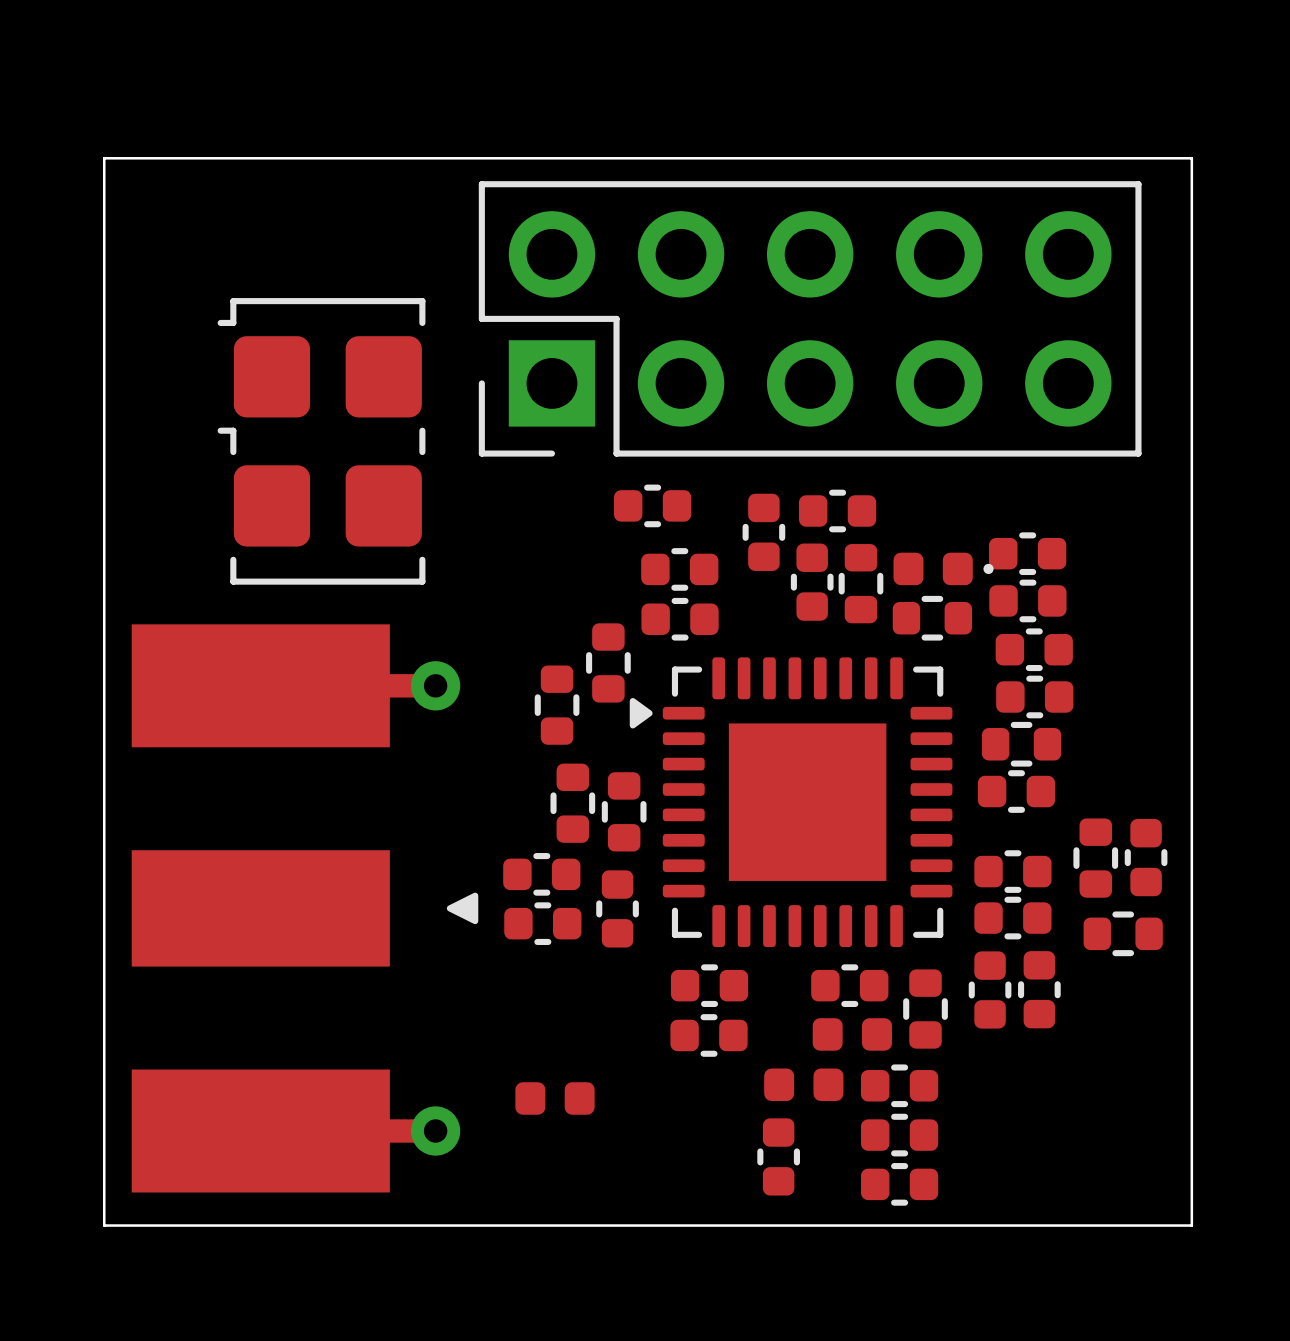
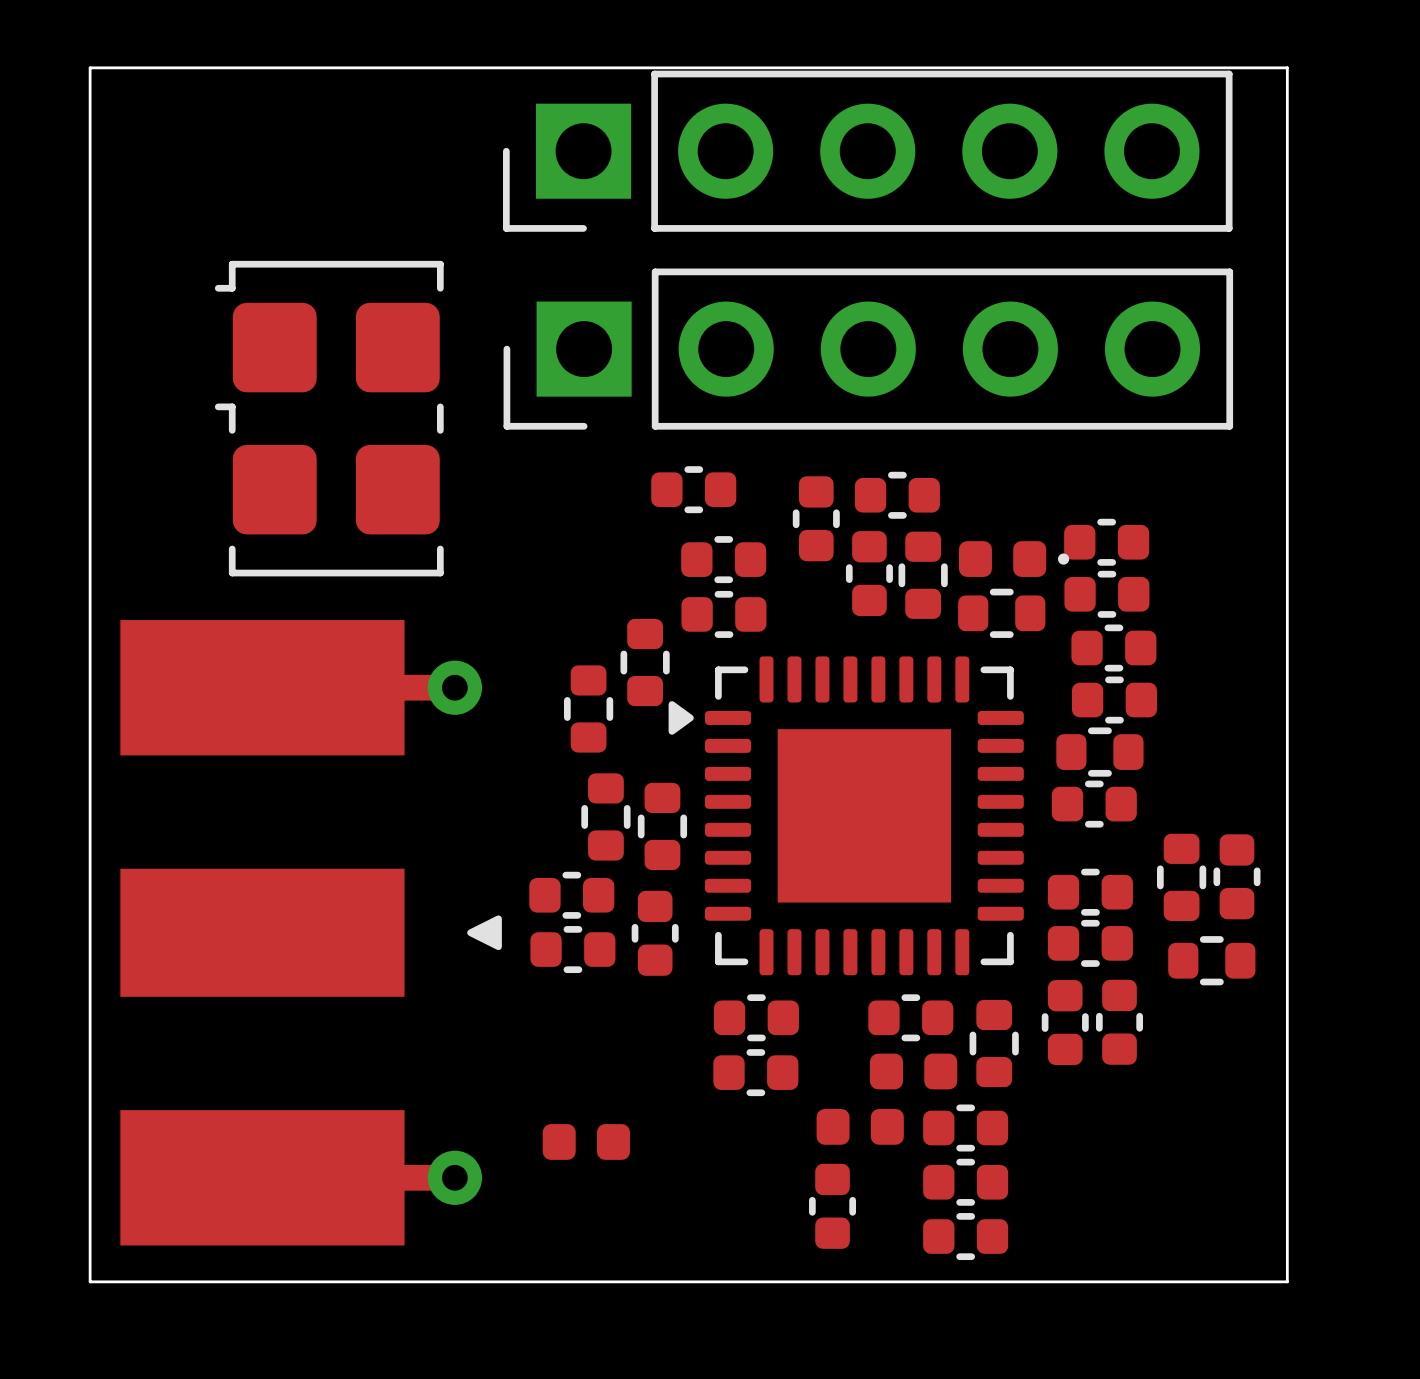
board edge: (104, 158) (1191, 158) -> (90, 107) (90, 67) (1287, 67) (1287, 107)
part: none -> (867, 151)
part: (810, 318) -> none
part: none -> (868, 349)

